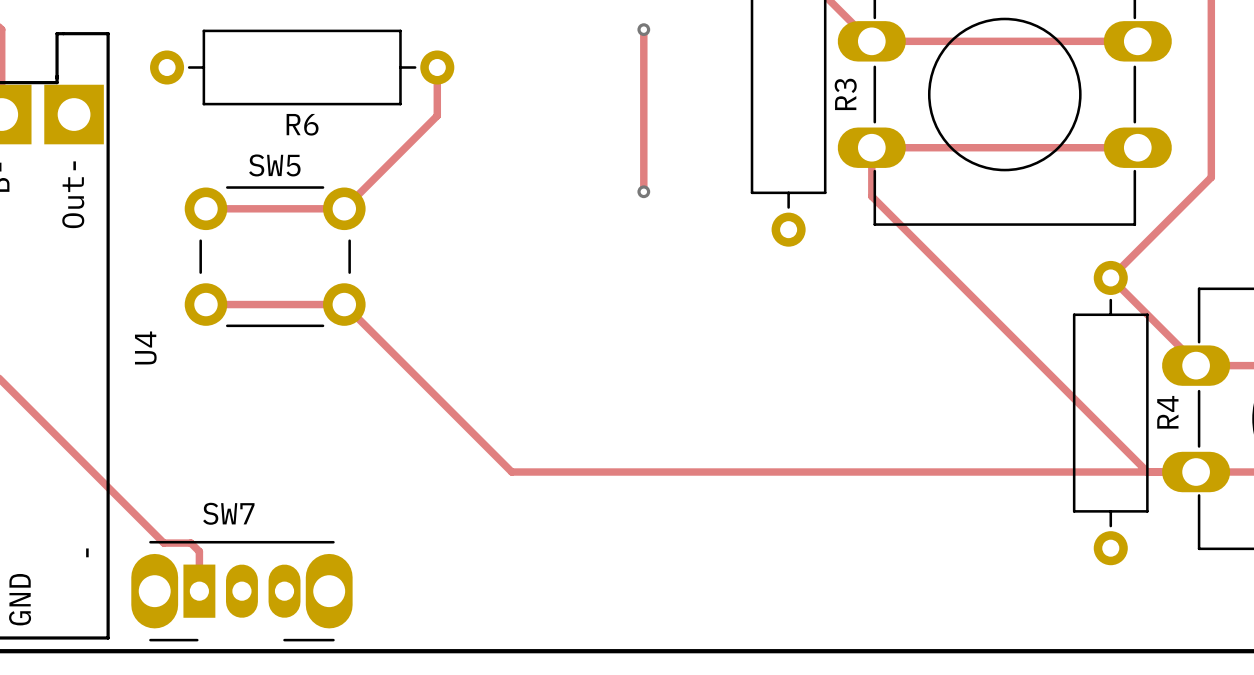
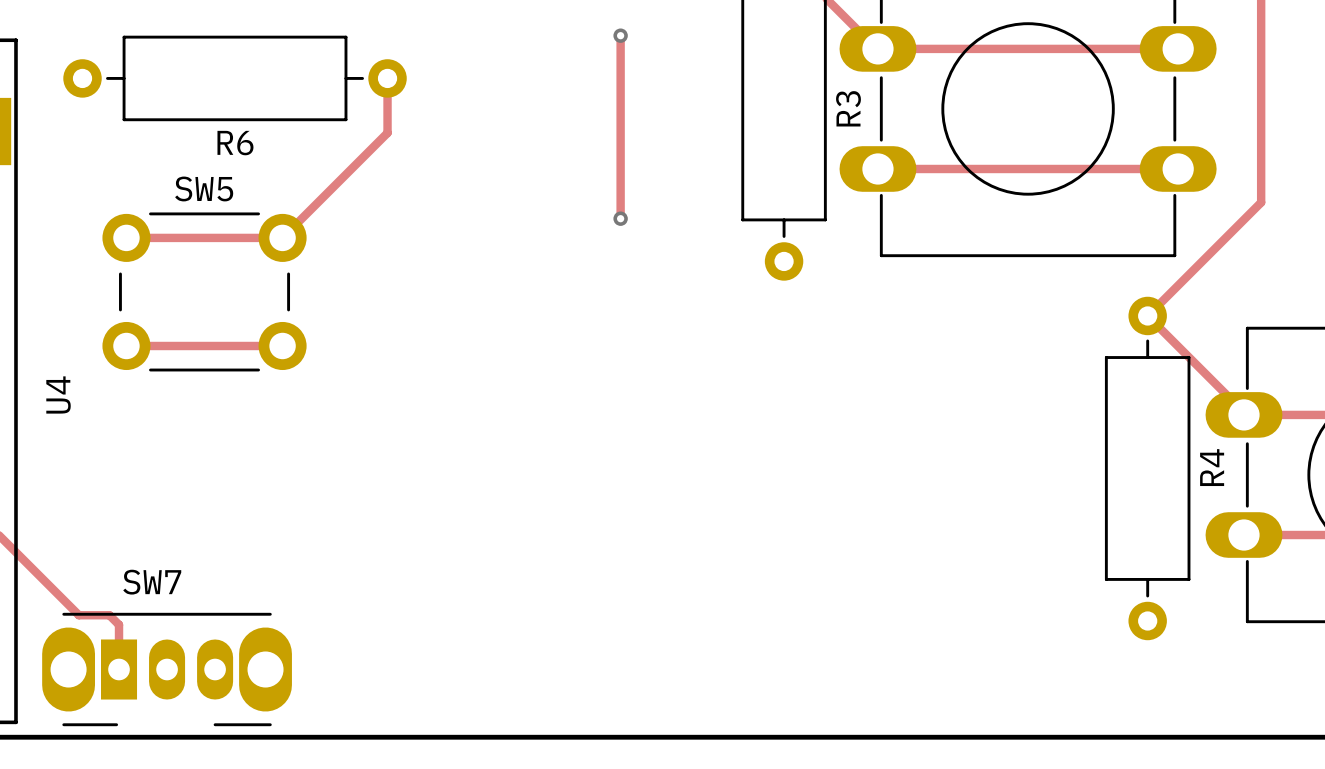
track: (871, 147) (871, 196) (1147, 472) -> none
track: (344, 304) (511, 472) (1196, 472) -> none

